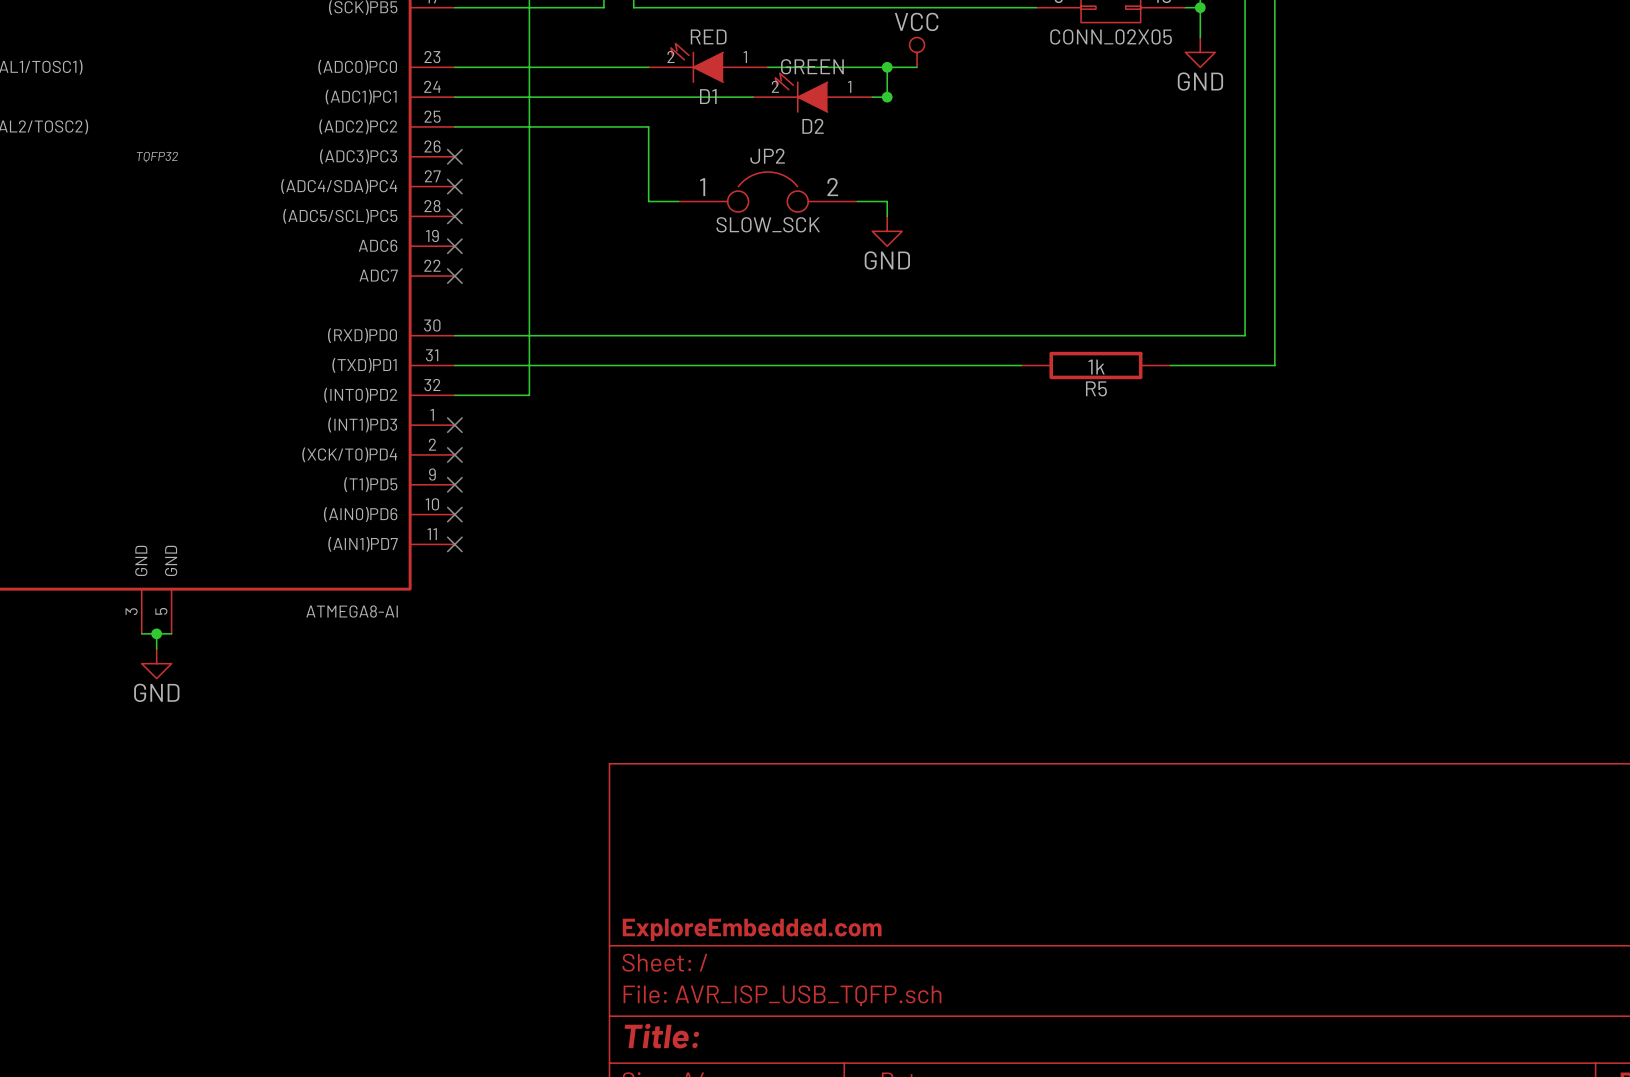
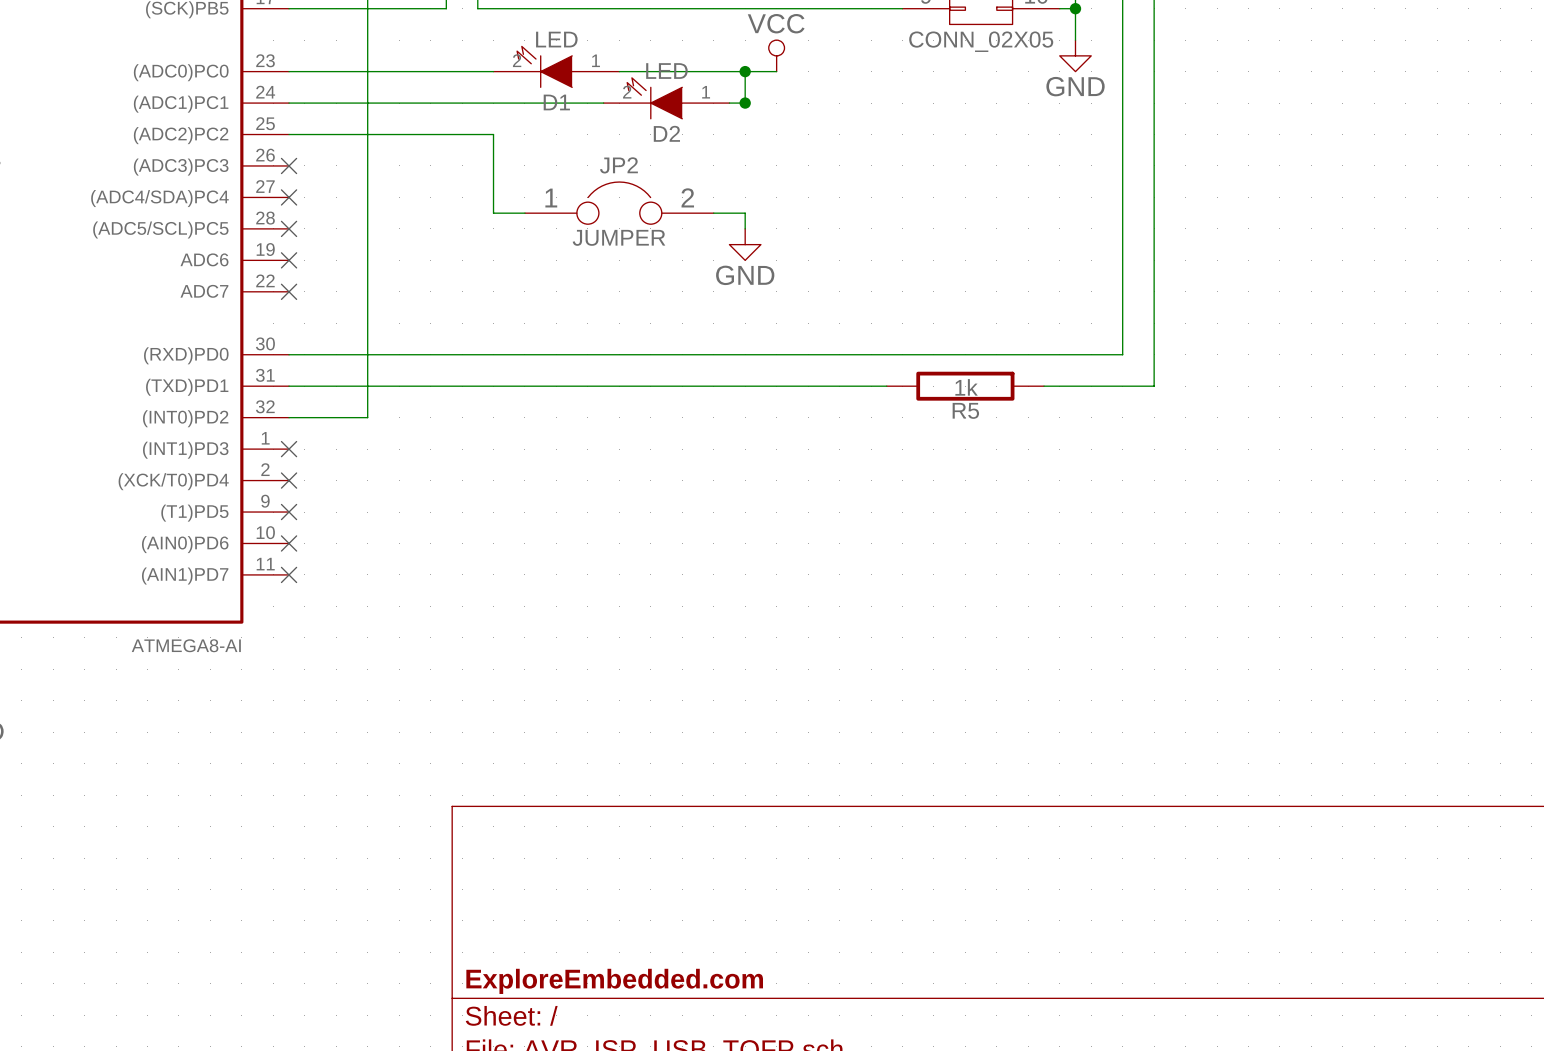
D1 value: RED (708, 36) -> LED (556, 39)
D2 value: GREEN (812, 66) -> LED (666, 71)
JP2 value: SLOW_SCK (768, 224) -> JUMPER (619, 237)

